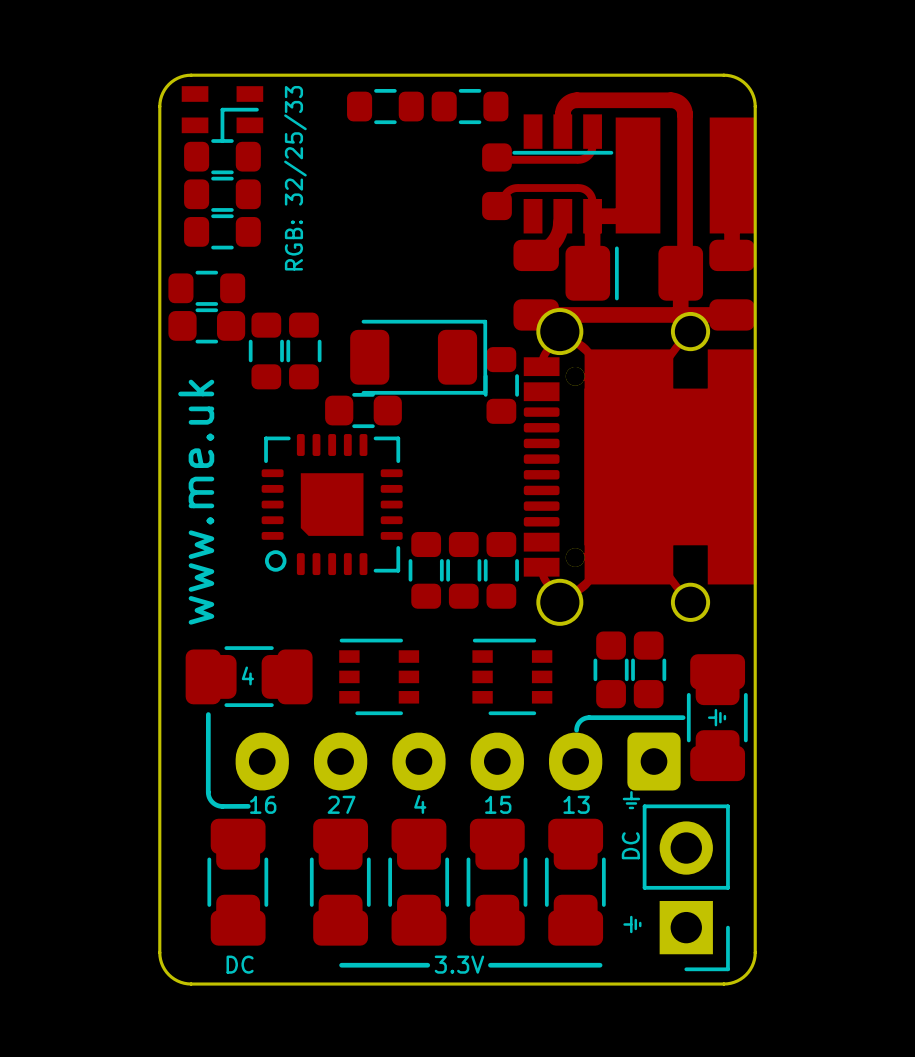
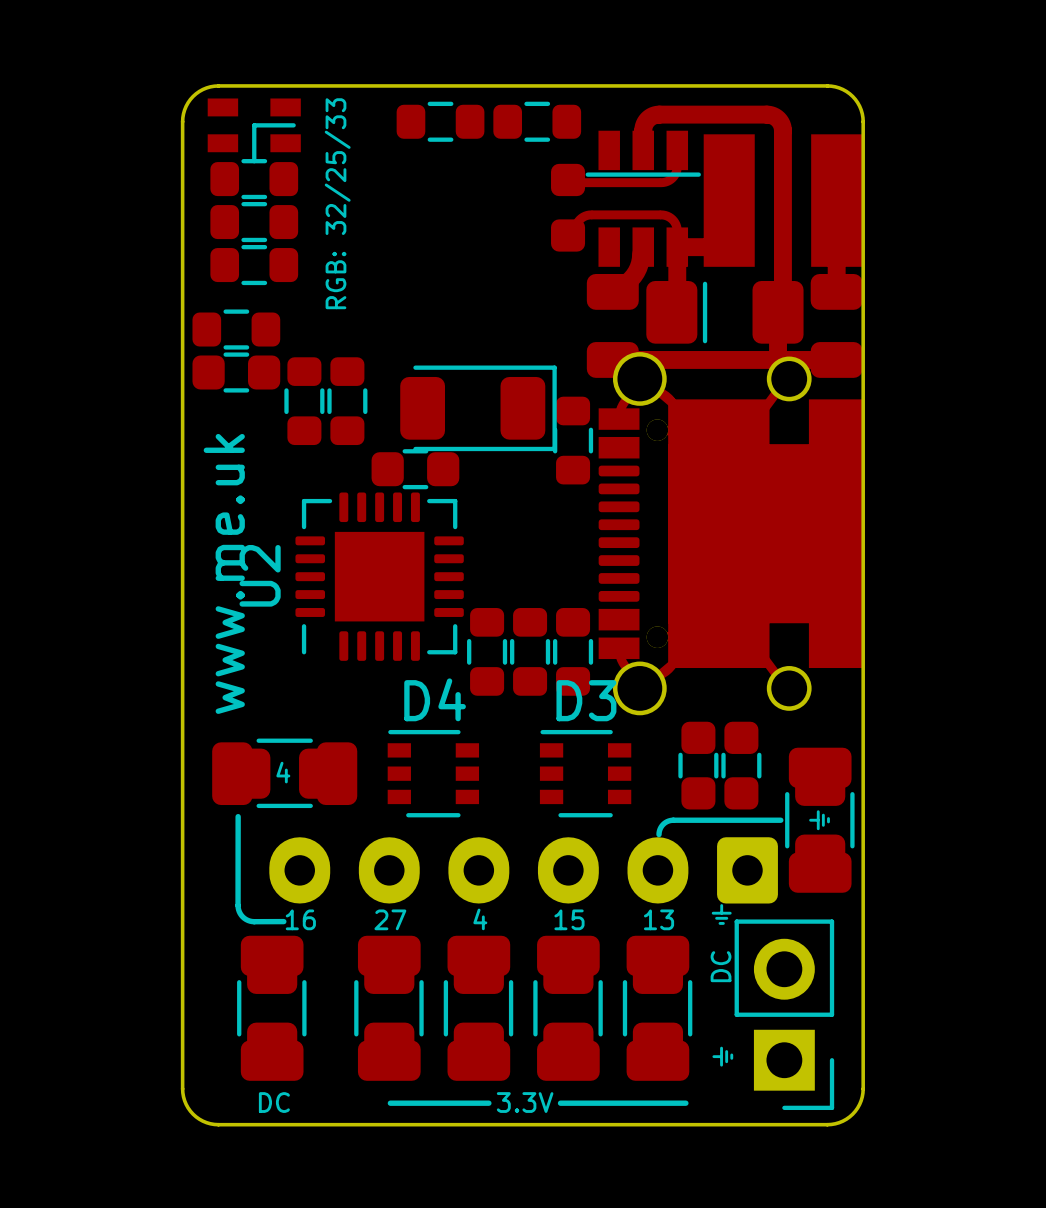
part: (332, 504) -> none
U2: none -> (379, 576)
D4 name: none -> D4 (435, 699)
D3 name: none -> D3 (586, 700)

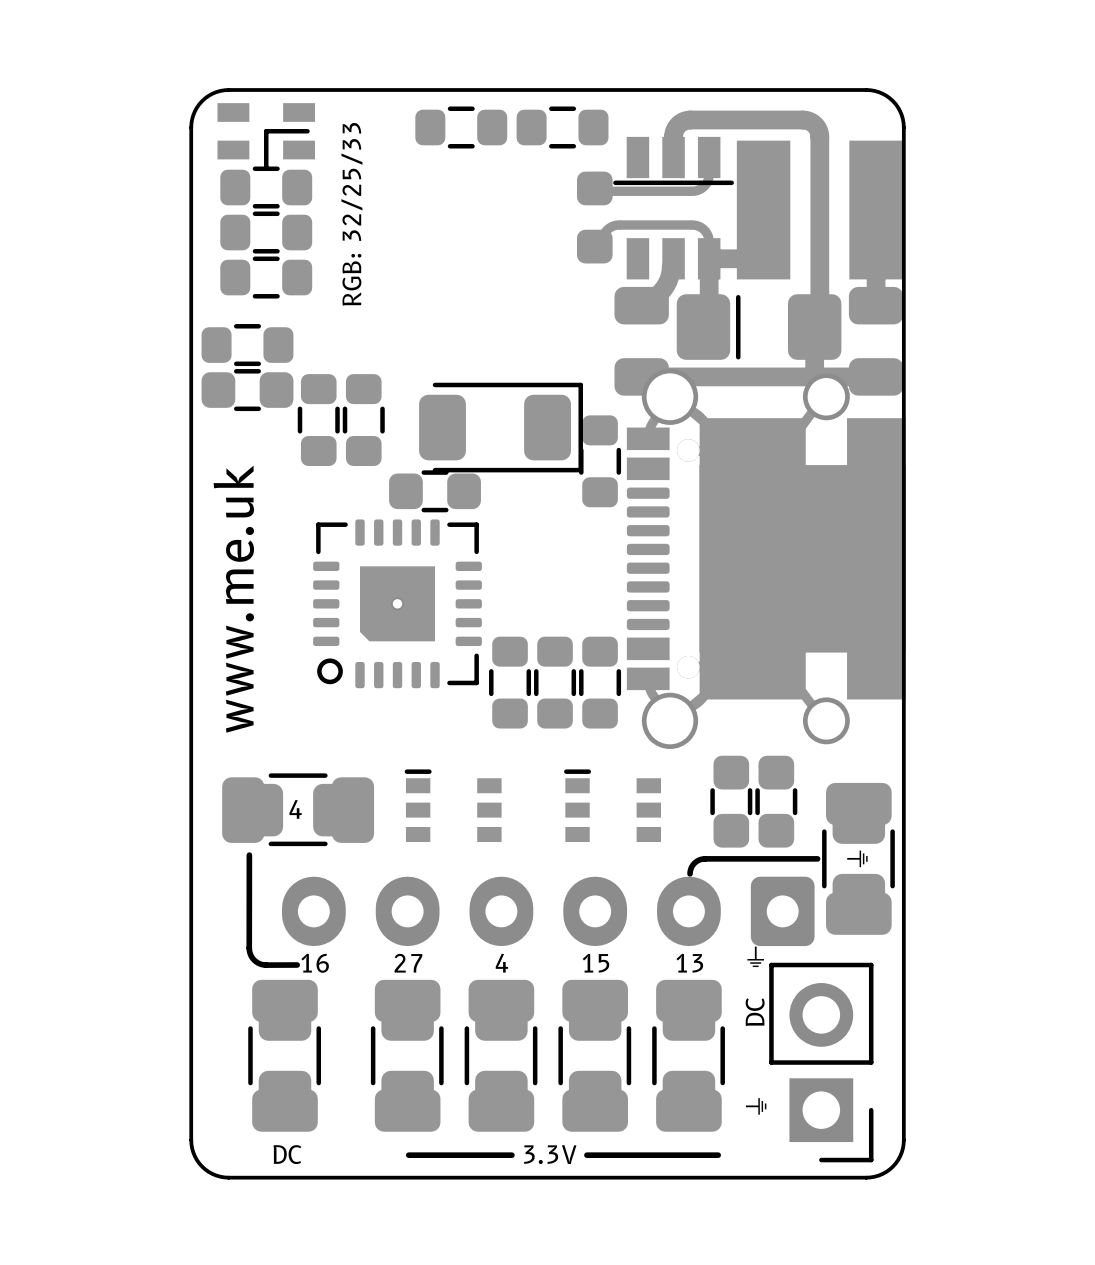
U2: (379, 576) -> none
part: none -> (397, 603)
part: none -> (453, 805)
part: none -> (612, 805)
D4: (433, 773) -> none
D3: (585, 773) -> none

